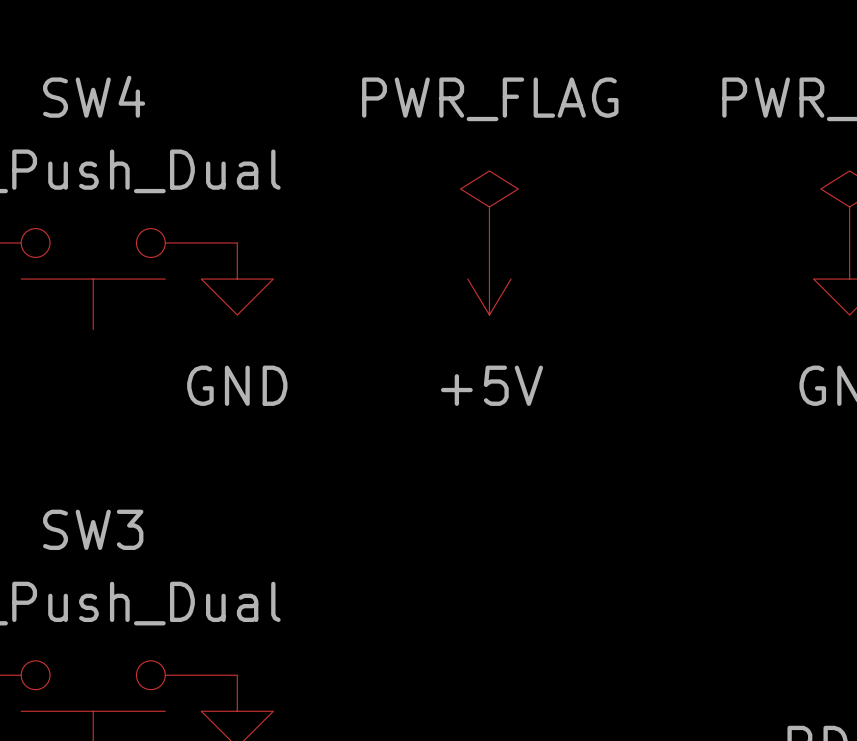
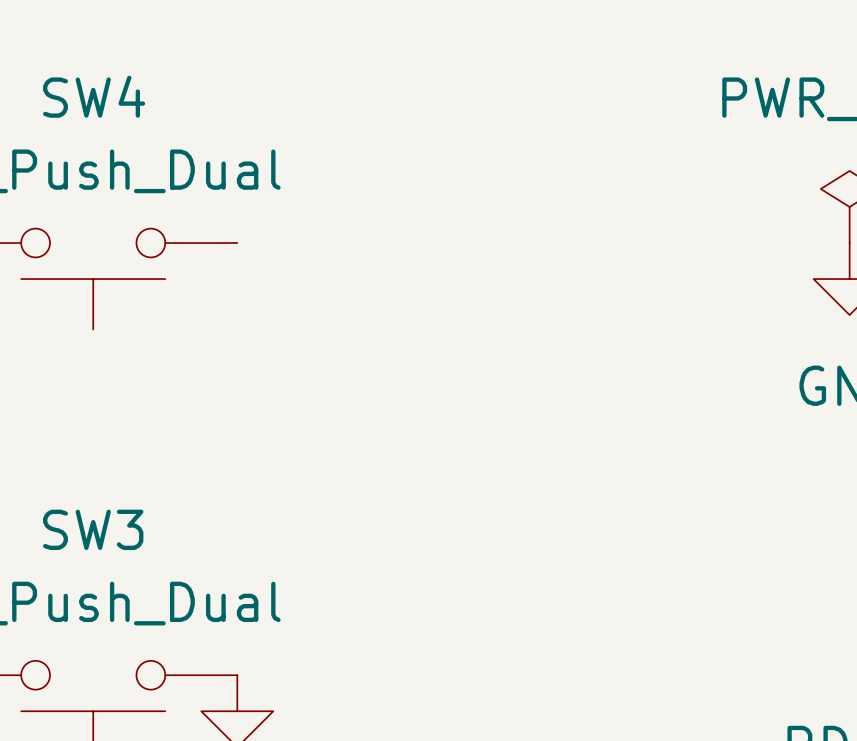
power symbol: PWR_FLAG (489, 206) -> none
power symbol: GND (237, 279) -> none
power symbol: +5V (489, 279) -> none

